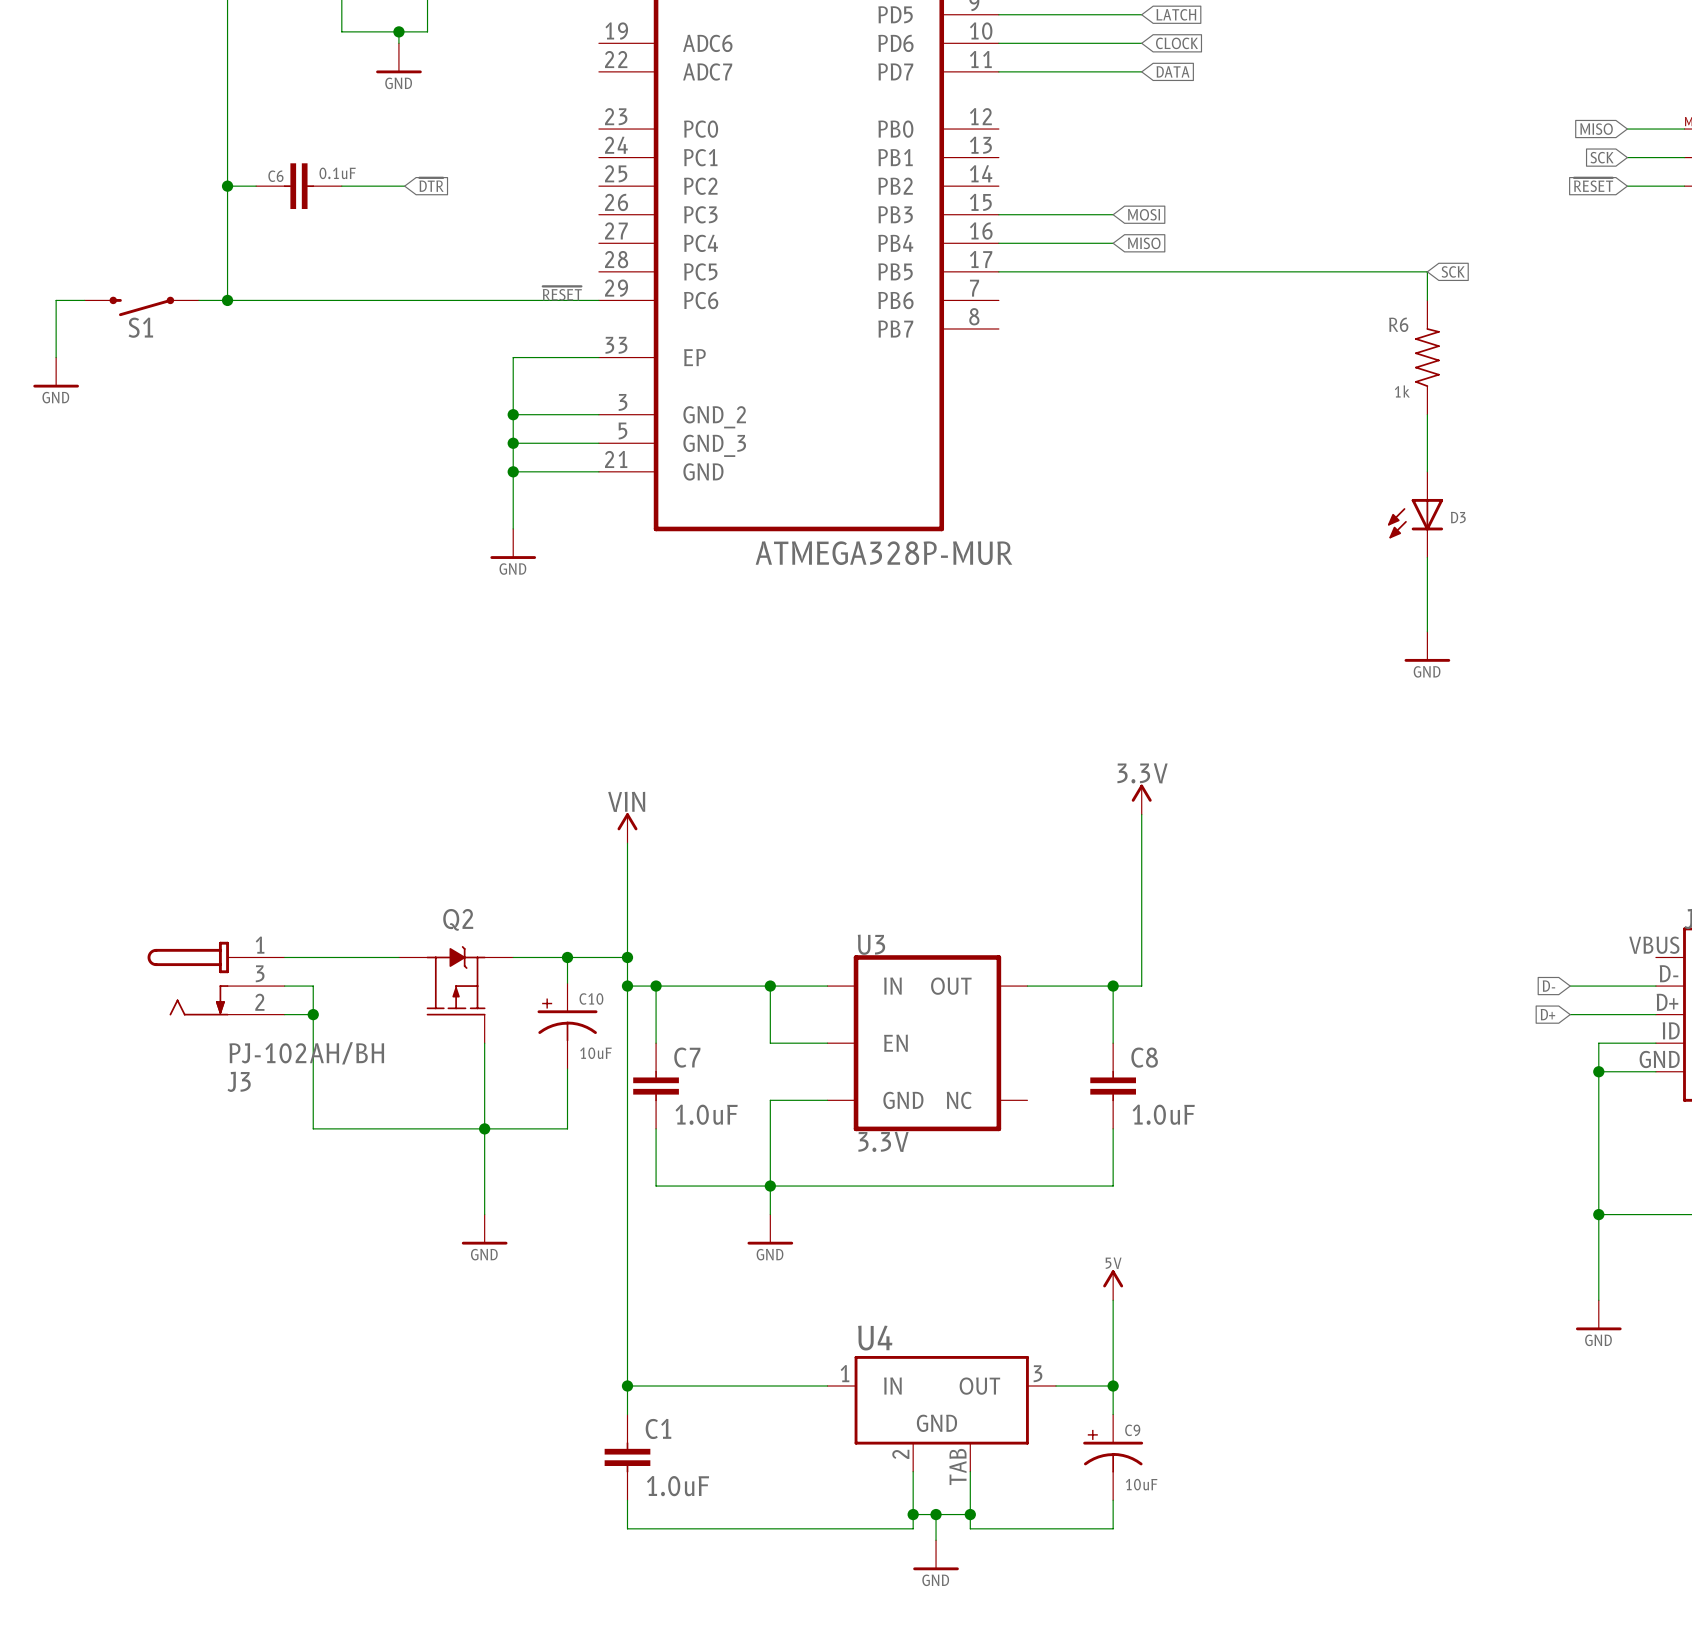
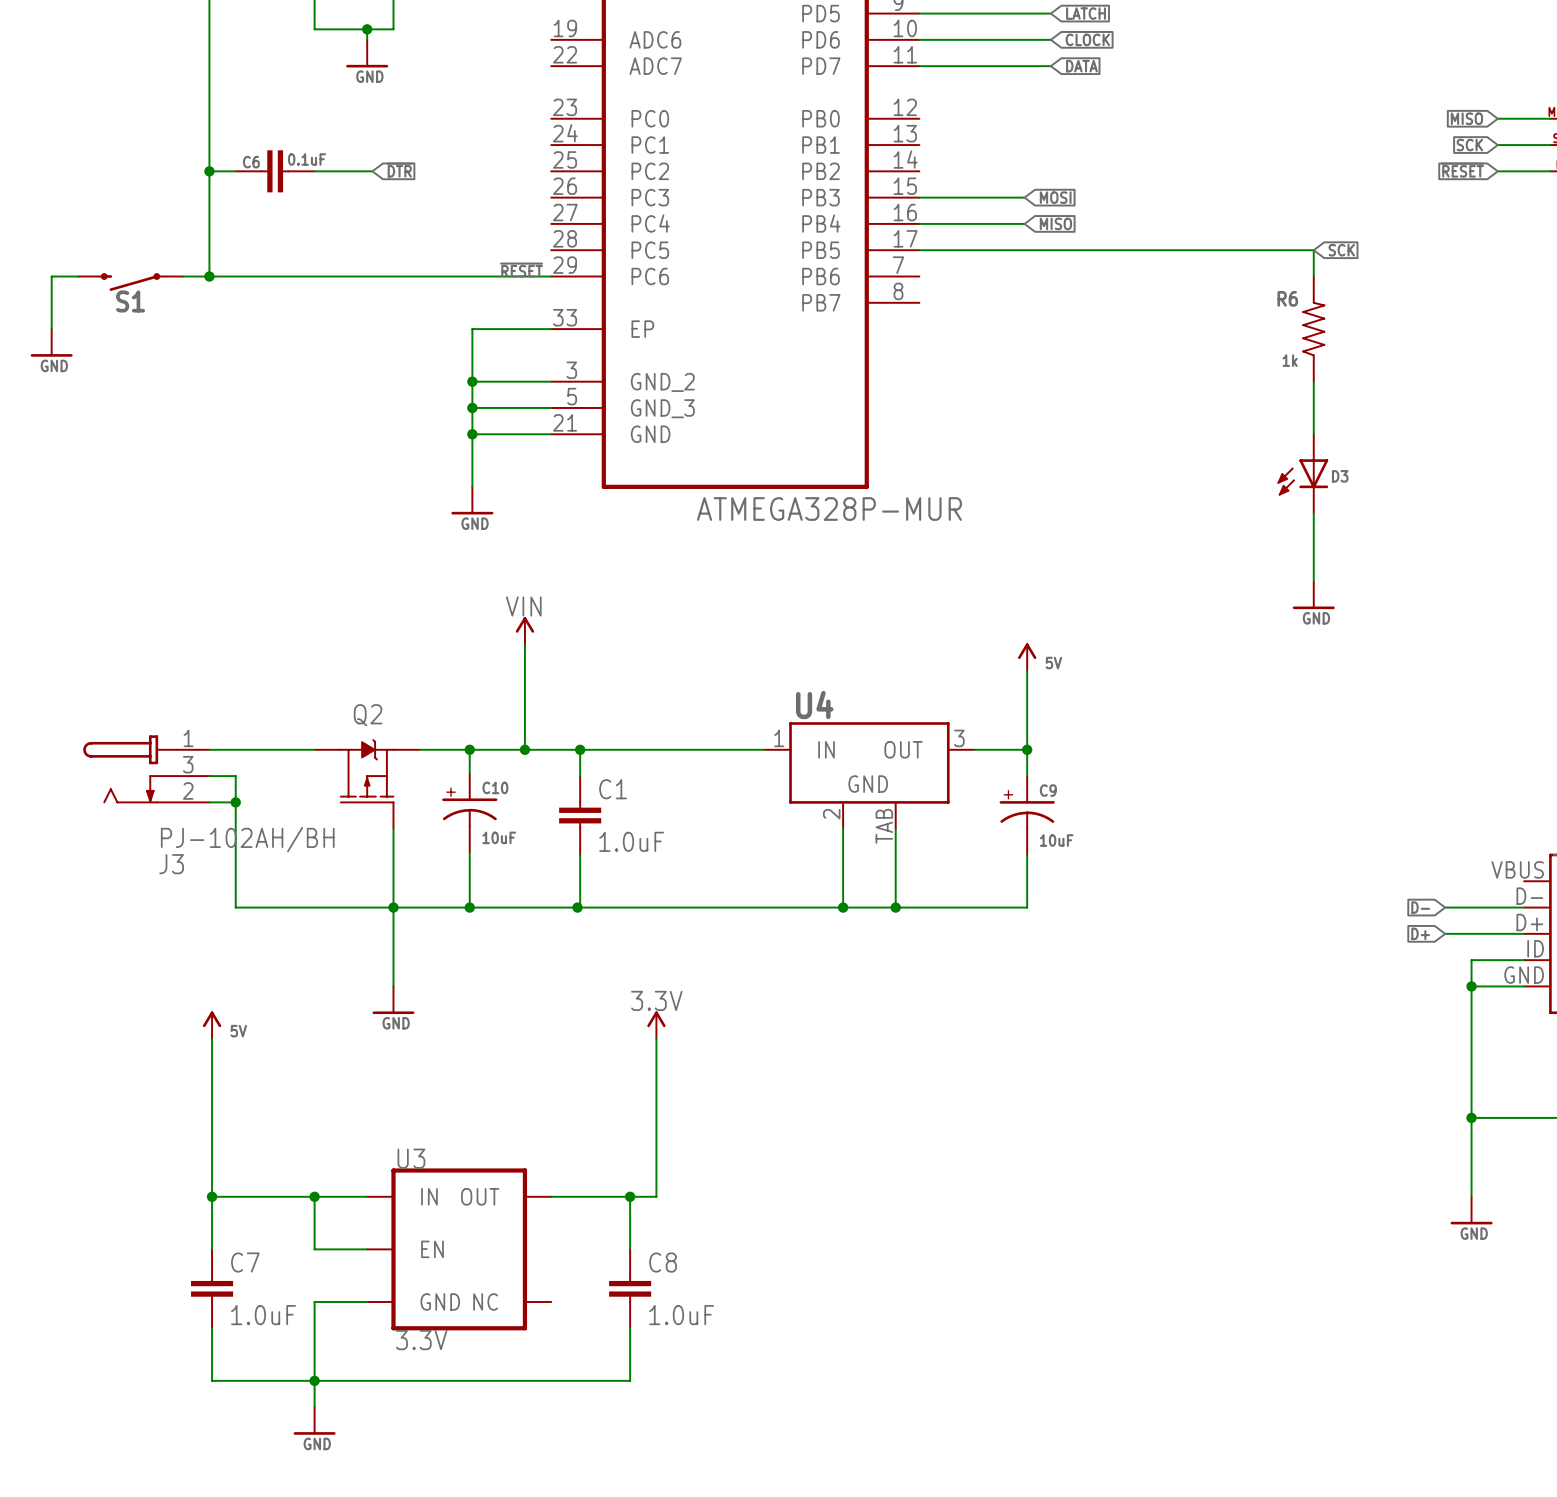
wire: none -> (524, 644) (524, 749)
power symbol: none -> 5V (1027, 657)
wire: none -> (1027, 670) (1027, 776)
power symbol: 3.3V (1141, 799) -> none
wire: none -> (419, 749) (764, 749)
junction: none -> (469, 749)
junction: none -> (524, 749)
wire: none -> (580, 749) (580, 776)
junction: none -> (580, 749)
wire: none -> (974, 749) (1027, 749)
junction: none -> (1027, 749)
wire: (1141, 814) (1141, 986) (1116, 986) -> (1027, 854) (1027, 907)
power symbol position: VIN (627, 828) -> VIN (524, 630)
wire: none -> (209, 776) (235, 776) (235, 907) (262, 907)
wire: (627, 843) (627, 1414) -> none
junction: none -> (235, 802)
wire: none -> (843, 828) (843, 907)
wire: none -> (895, 828) (895, 907)
wire: none -> (469, 852) (469, 907)
wire: (284, 957) (398, 957) -> (209, 749) (314, 749)
wire: (513, 957) (627, 957) -> none
wire: (567, 957) (567, 983) -> (469, 749) (469, 773)
junction: (567, 957) -> none
junction: (627, 957) -> none
J3 position: (216, 978) -> (146, 769)
wire: (313, 986) (313, 1128) (567, 1128) (567, 1068) -> (288, 907) (577, 907)
junction: none -> (393, 907)
junction: none -> (469, 907)
wire: (656, 986) (656, 1043) -> (580, 854) (580, 907)
junction: (656, 986) -> none
wire: (770, 986) (770, 1043) (827, 1043) -> none
junction: (770, 986) -> none
wire: none -> (761, 907) (945, 907)
junction: none -> (843, 907)
junction: none -> (895, 907)
wire: (1113, 986) (1113, 1043) -> none
junction: (1113, 986) -> none
Q2 position: (456, 994) -> (367, 783)
wire: (284, 1014) (313, 1014) -> (209, 802) (235, 802)
junction: (313, 1014) -> none
C10 position: (567, 1026) -> (469, 812)
wire: (484, 1043) (484, 1214) -> (393, 828) (393, 986)
U3 position: (927, 1043) -> (459, 1249)
C7 position: (656, 1086) -> (212, 1288)
C8 position: (1113, 1086) -> (630, 1288)
wire: (827, 1100) (770, 1100) (770, 1214) -> none
power symbol: none -> 5V (212, 1025)
power symbol: none -> 3.3V (656, 1025)
wire: none -> (212, 1039) (212, 1249)
junction: (484, 1128) -> none
wire: (656, 1128) (656, 1186) (1113, 1186) (1113, 1128) -> none
wire: none -> (656, 1039) (656, 1196) (551, 1196)
junction: (770, 1186) -> none
power symbol position: GND (484, 1229) -> GND (393, 1000)
power symbol: GND (770, 1229) -> none
power symbol: 5V (1113, 1285) -> none
wire: none -> (212, 1196) (367, 1196)
junction: none -> (212, 1196)
wire: none -> (314, 1196) (314, 1249) (367, 1249)
junction: none -> (314, 1196)
wire: none -> (630, 1196) (630, 1249)
junction: none -> (630, 1196)
wire: (1113, 1300) (1113, 1414) -> none
wire: (627, 1386) (827, 1386) -> none
junction: (627, 1386) -> none
wire: (1056, 1386) (1113, 1386) -> none
junction: (1113, 1386) -> none
U4 position: (941, 1413) -> (869, 775)
wire: none -> (367, 1301) (314, 1301) (314, 1407)
wire: none -> (212, 1328) (212, 1380) (630, 1380) (630, 1328)
C1 position: (627, 1457) -> (580, 815)
C9 position: (1113, 1457) -> (1027, 815)
wire: (913, 1471) (913, 1528) (627, 1528) (627, 1500) -> none
wire: (970, 1471) (970, 1528) (1113, 1528) (1113, 1500) -> none
junction: none -> (314, 1380)
wire: (913, 1514) (970, 1514) -> none
junction: (913, 1514) -> none
wire: (936, 1514) (936, 1540) -> none
junction: (936, 1514) -> none
junction: (970, 1514) -> none
power symbol: none -> GND (314, 1420)
power symbol: GND (936, 1555) -> none

